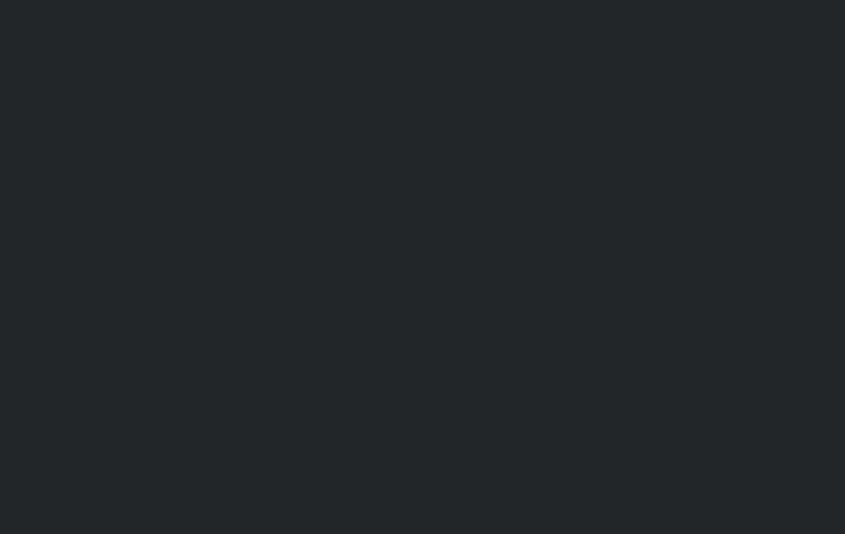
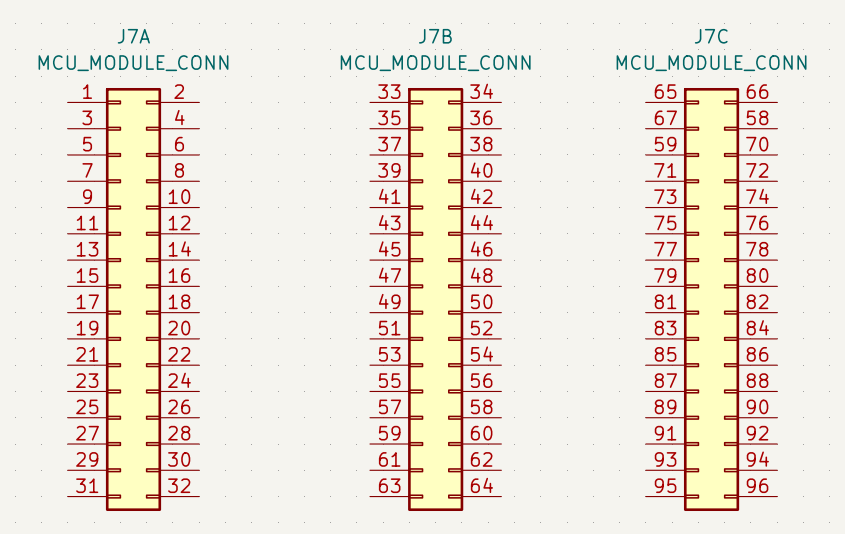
J7A: none -> MCU_MODULE_CONN (133, 299)
J7B: none -> MCU_MODULE_CONN (435, 299)
J7C: none -> MCU_MODULE_CONN (711, 299)

